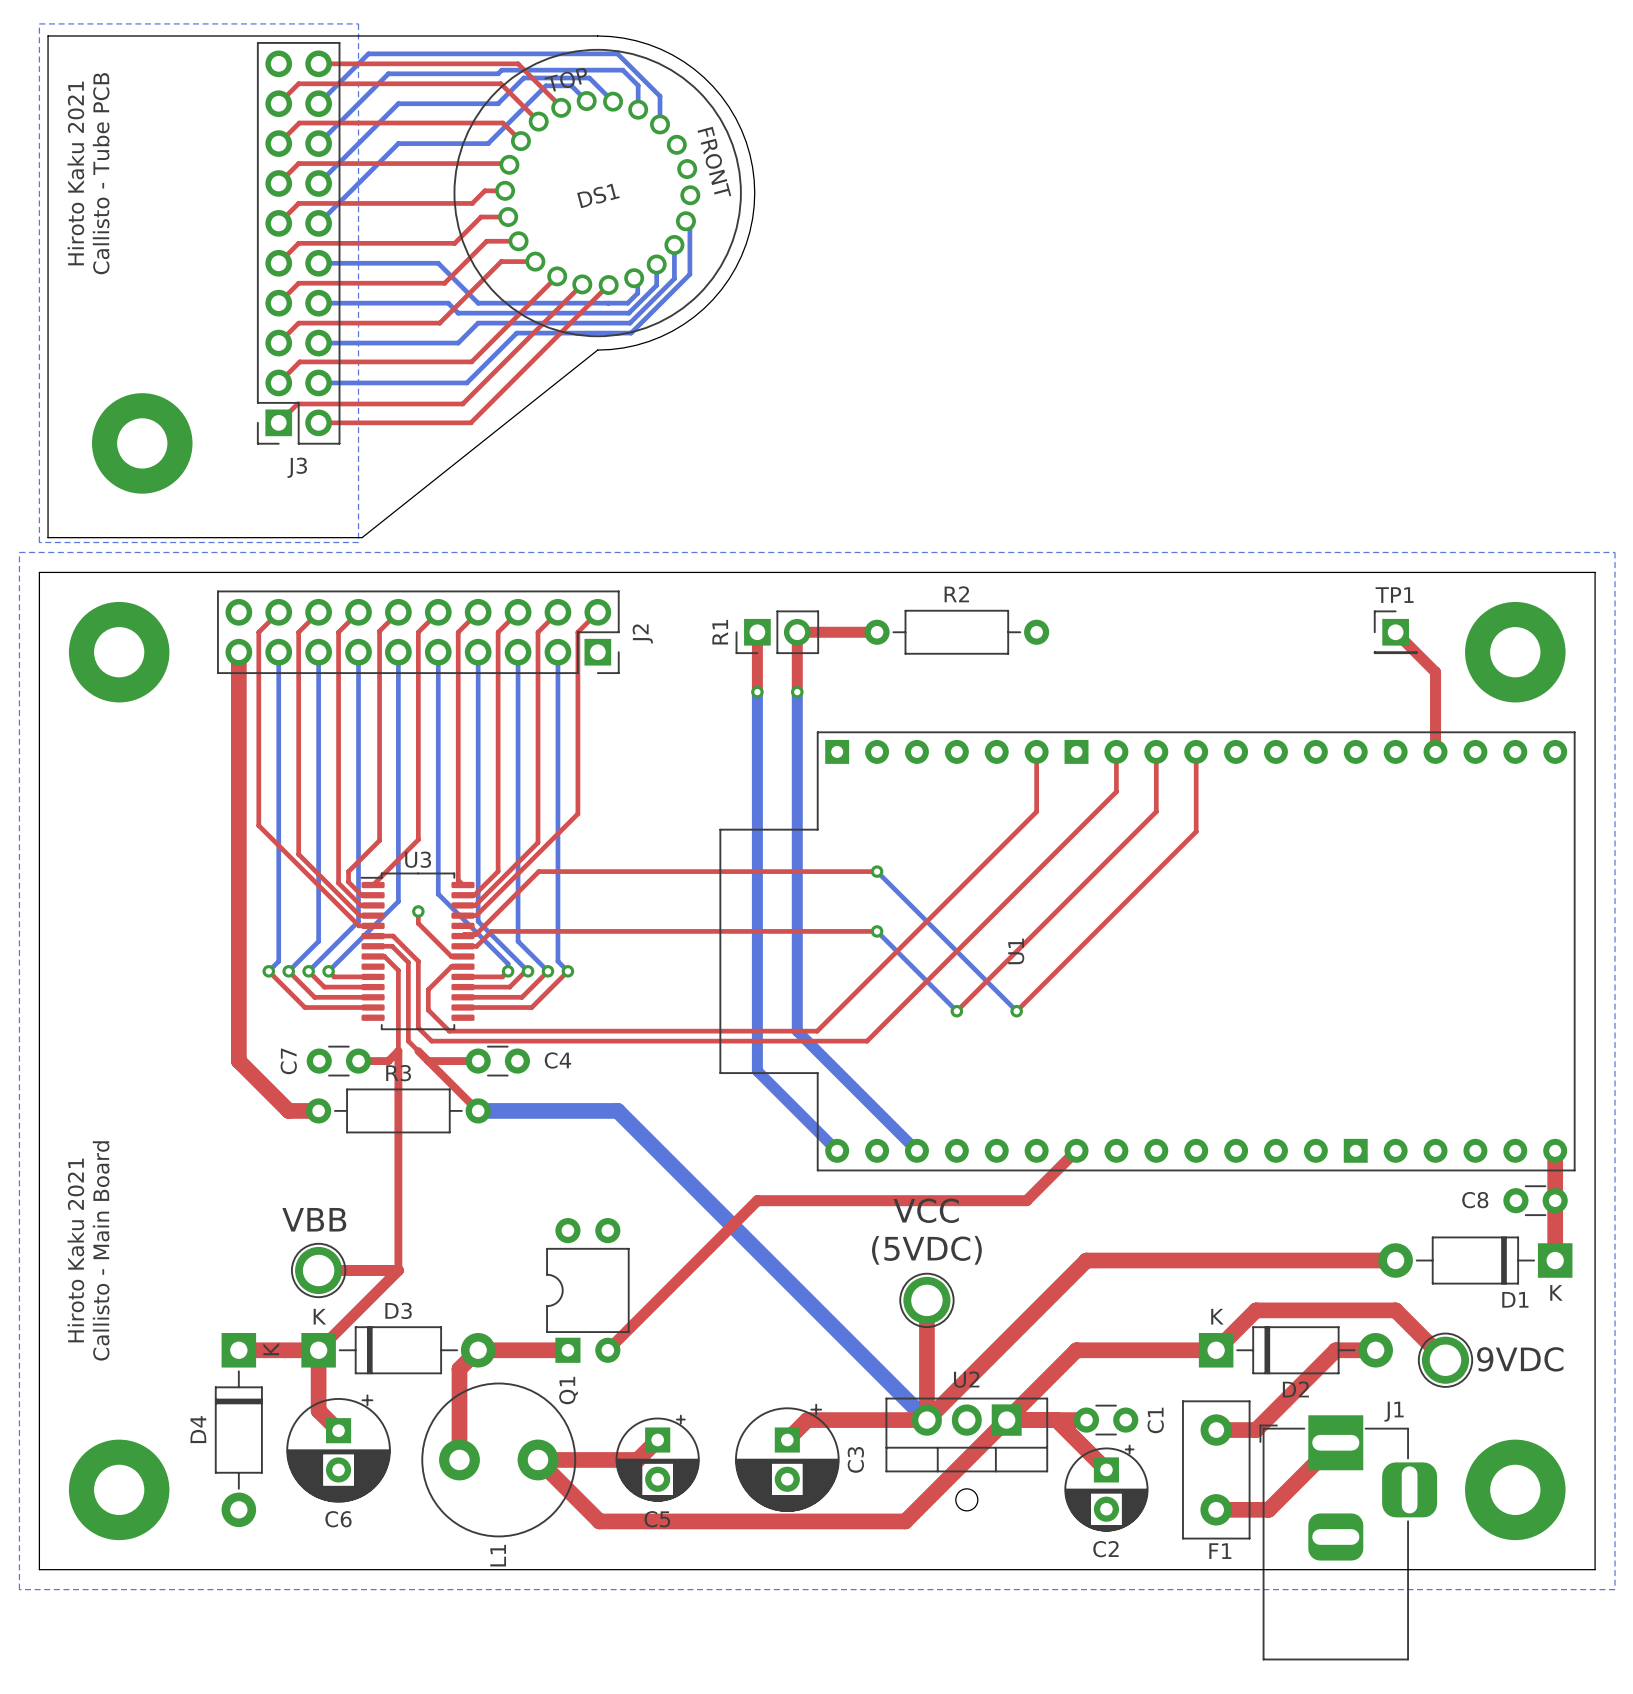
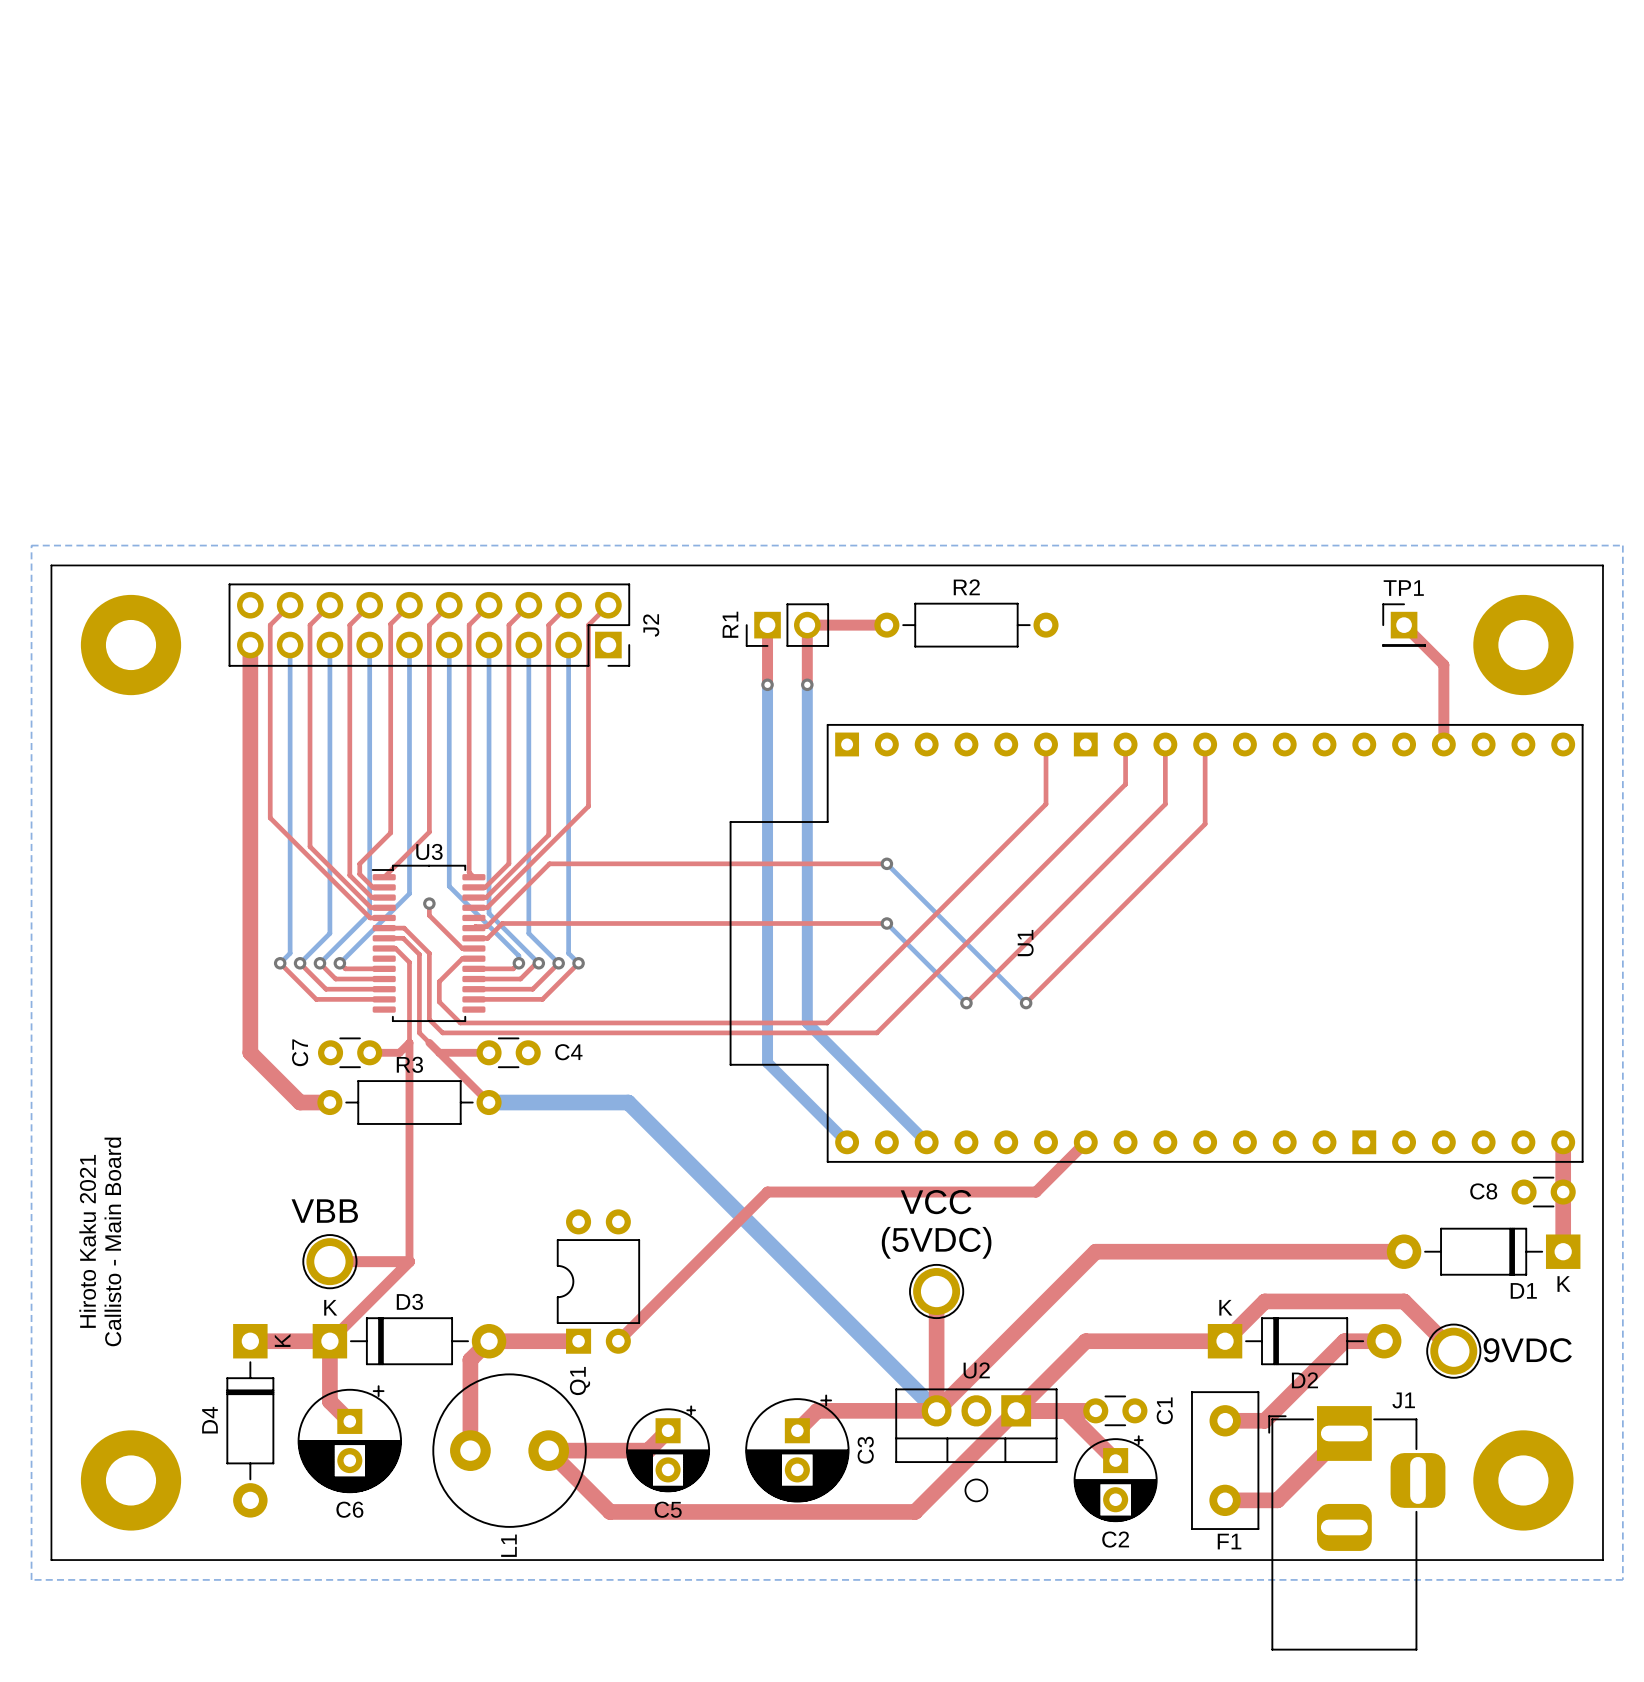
bottom zone outline: (39, 23) (39, 542) (358, 542) (358, 23) (39, 23) -> none
board edge: (48, 35) (48, 537) (362, 537) (597, 350) (623, 347) (648, 341) (672, 331) (694, 316) (713, 299) (729, 278) (741, 256) (749, 231) (754, 206) (754, 180) (746, 142) (735, 118) (713, 86) (694, 69) (660, 49) (636, 40) (597, 35) (48, 35) -> none
top track: (318, 63) (518, 63) (561, 107) -> none
bottom track: (586, 101) (571, 85) (545, 85) (488, 143) (398, 143) (318, 223) -> none
bottom track: (613, 101) (589, 78) (523, 78) (498, 103) (398, 103) (318, 183) -> none
top track: (278, 103) (298, 83) (500, 83) (538, 121) -> none
bottom track: (318, 103) (368, 53) (617, 53) (660, 96) (660, 124) -> none
bottom track: (638, 109) (638, 85) (622, 70) (501, 70) (498, 73) (388, 73) (318, 143) -> none
top track: (520, 141) (502, 123) (299, 123) (278, 143) -> none
top track: (509, 164) (298, 163) (278, 183) -> none
text: Hiroto Kaku 2021 (75, 173) -> none
text: Callisto - Tube PCB (101, 173) -> none
top track: (505, 190) (484, 190) (472, 203) (298, 203) (278, 223) -> none
DS1: (597, 193) -> none
top track: (508, 217) (481, 217) (454, 243) (298, 243) (278, 263) -> none
bottom track: (685, 221) (689, 225) (689, 274) (631, 333) (516, 333) (466, 382) (318, 382) -> none
top track: (518, 241) (486, 241) (444, 283) (298, 283) (278, 303) -> none
J3: (298, 243) -> none
bottom track: (674, 244) (674, 278) (630, 323) (478, 323) (458, 343) (318, 343) -> none
top track: (535, 261) (501, 261) (439, 323) (298, 323) (278, 343) -> none
bottom track: (318, 263) (438, 263) (478, 303) (627, 303) (637, 293) (637, 281) (634, 278) -> none
bottom track: (656, 264) (656, 285) (628, 313) (458, 313) (448, 303) (318, 303) -> none
top track: (557, 276) (471, 361) (299, 361) (278, 382) -> none
top track: (582, 284) (462, 403) (297, 403) (278, 422) -> none
top track: (608, 285) (470, 422) (318, 422) -> none
part: (142, 443) -> none

